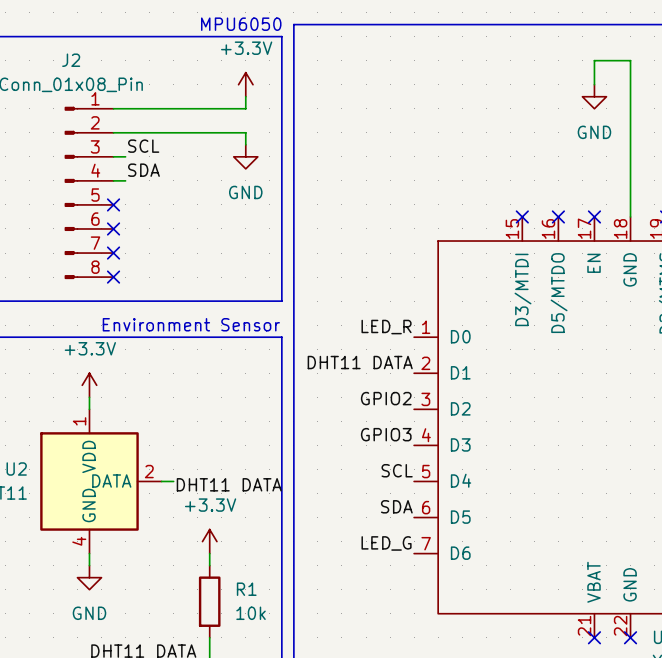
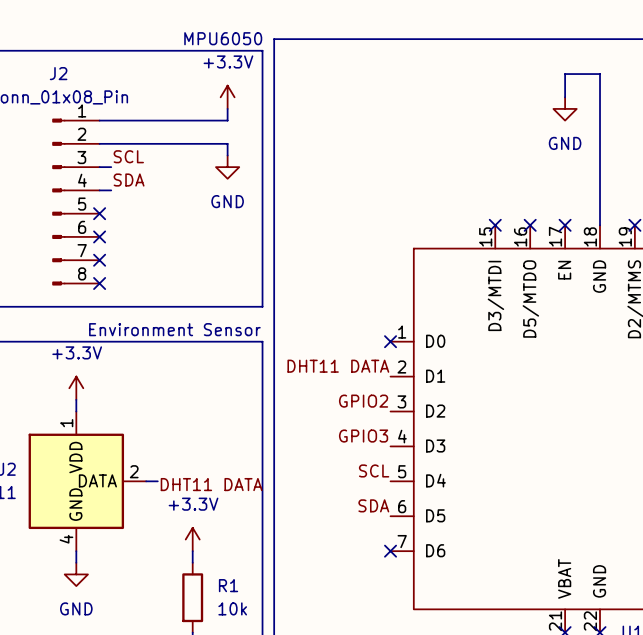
label: LED_R (386, 327) -> none
no-connect mark: none -> (390, 341)
label: LED_G (386, 543) -> none
no-connect mark: none -> (390, 551)

